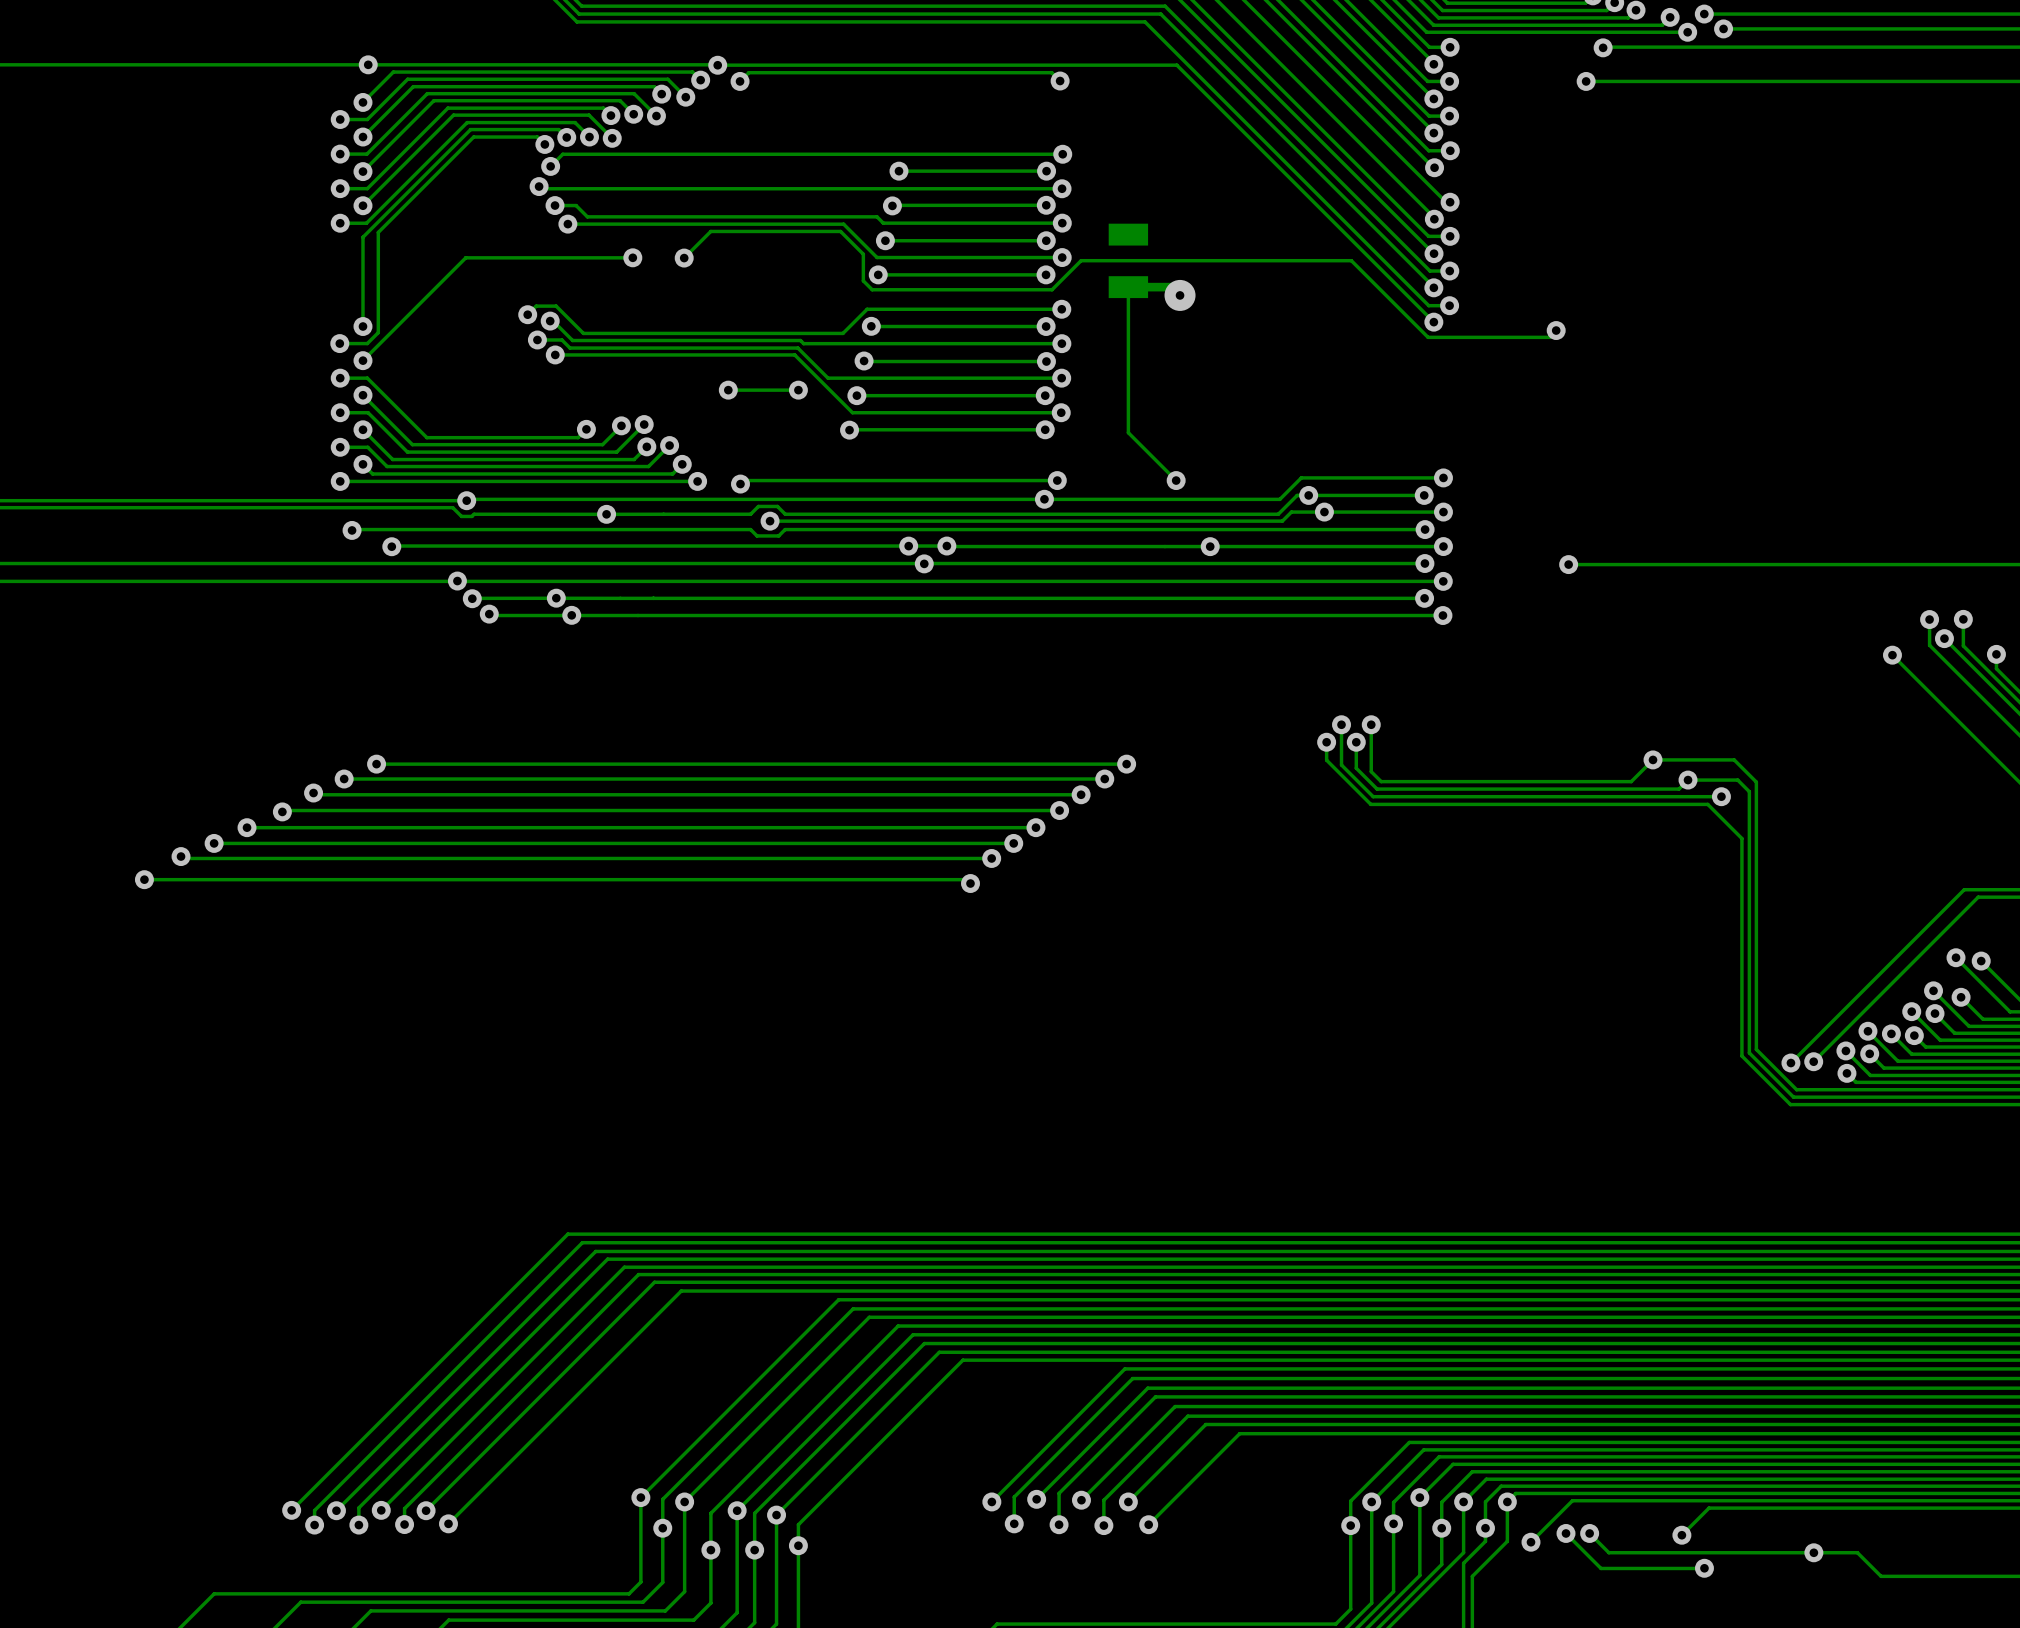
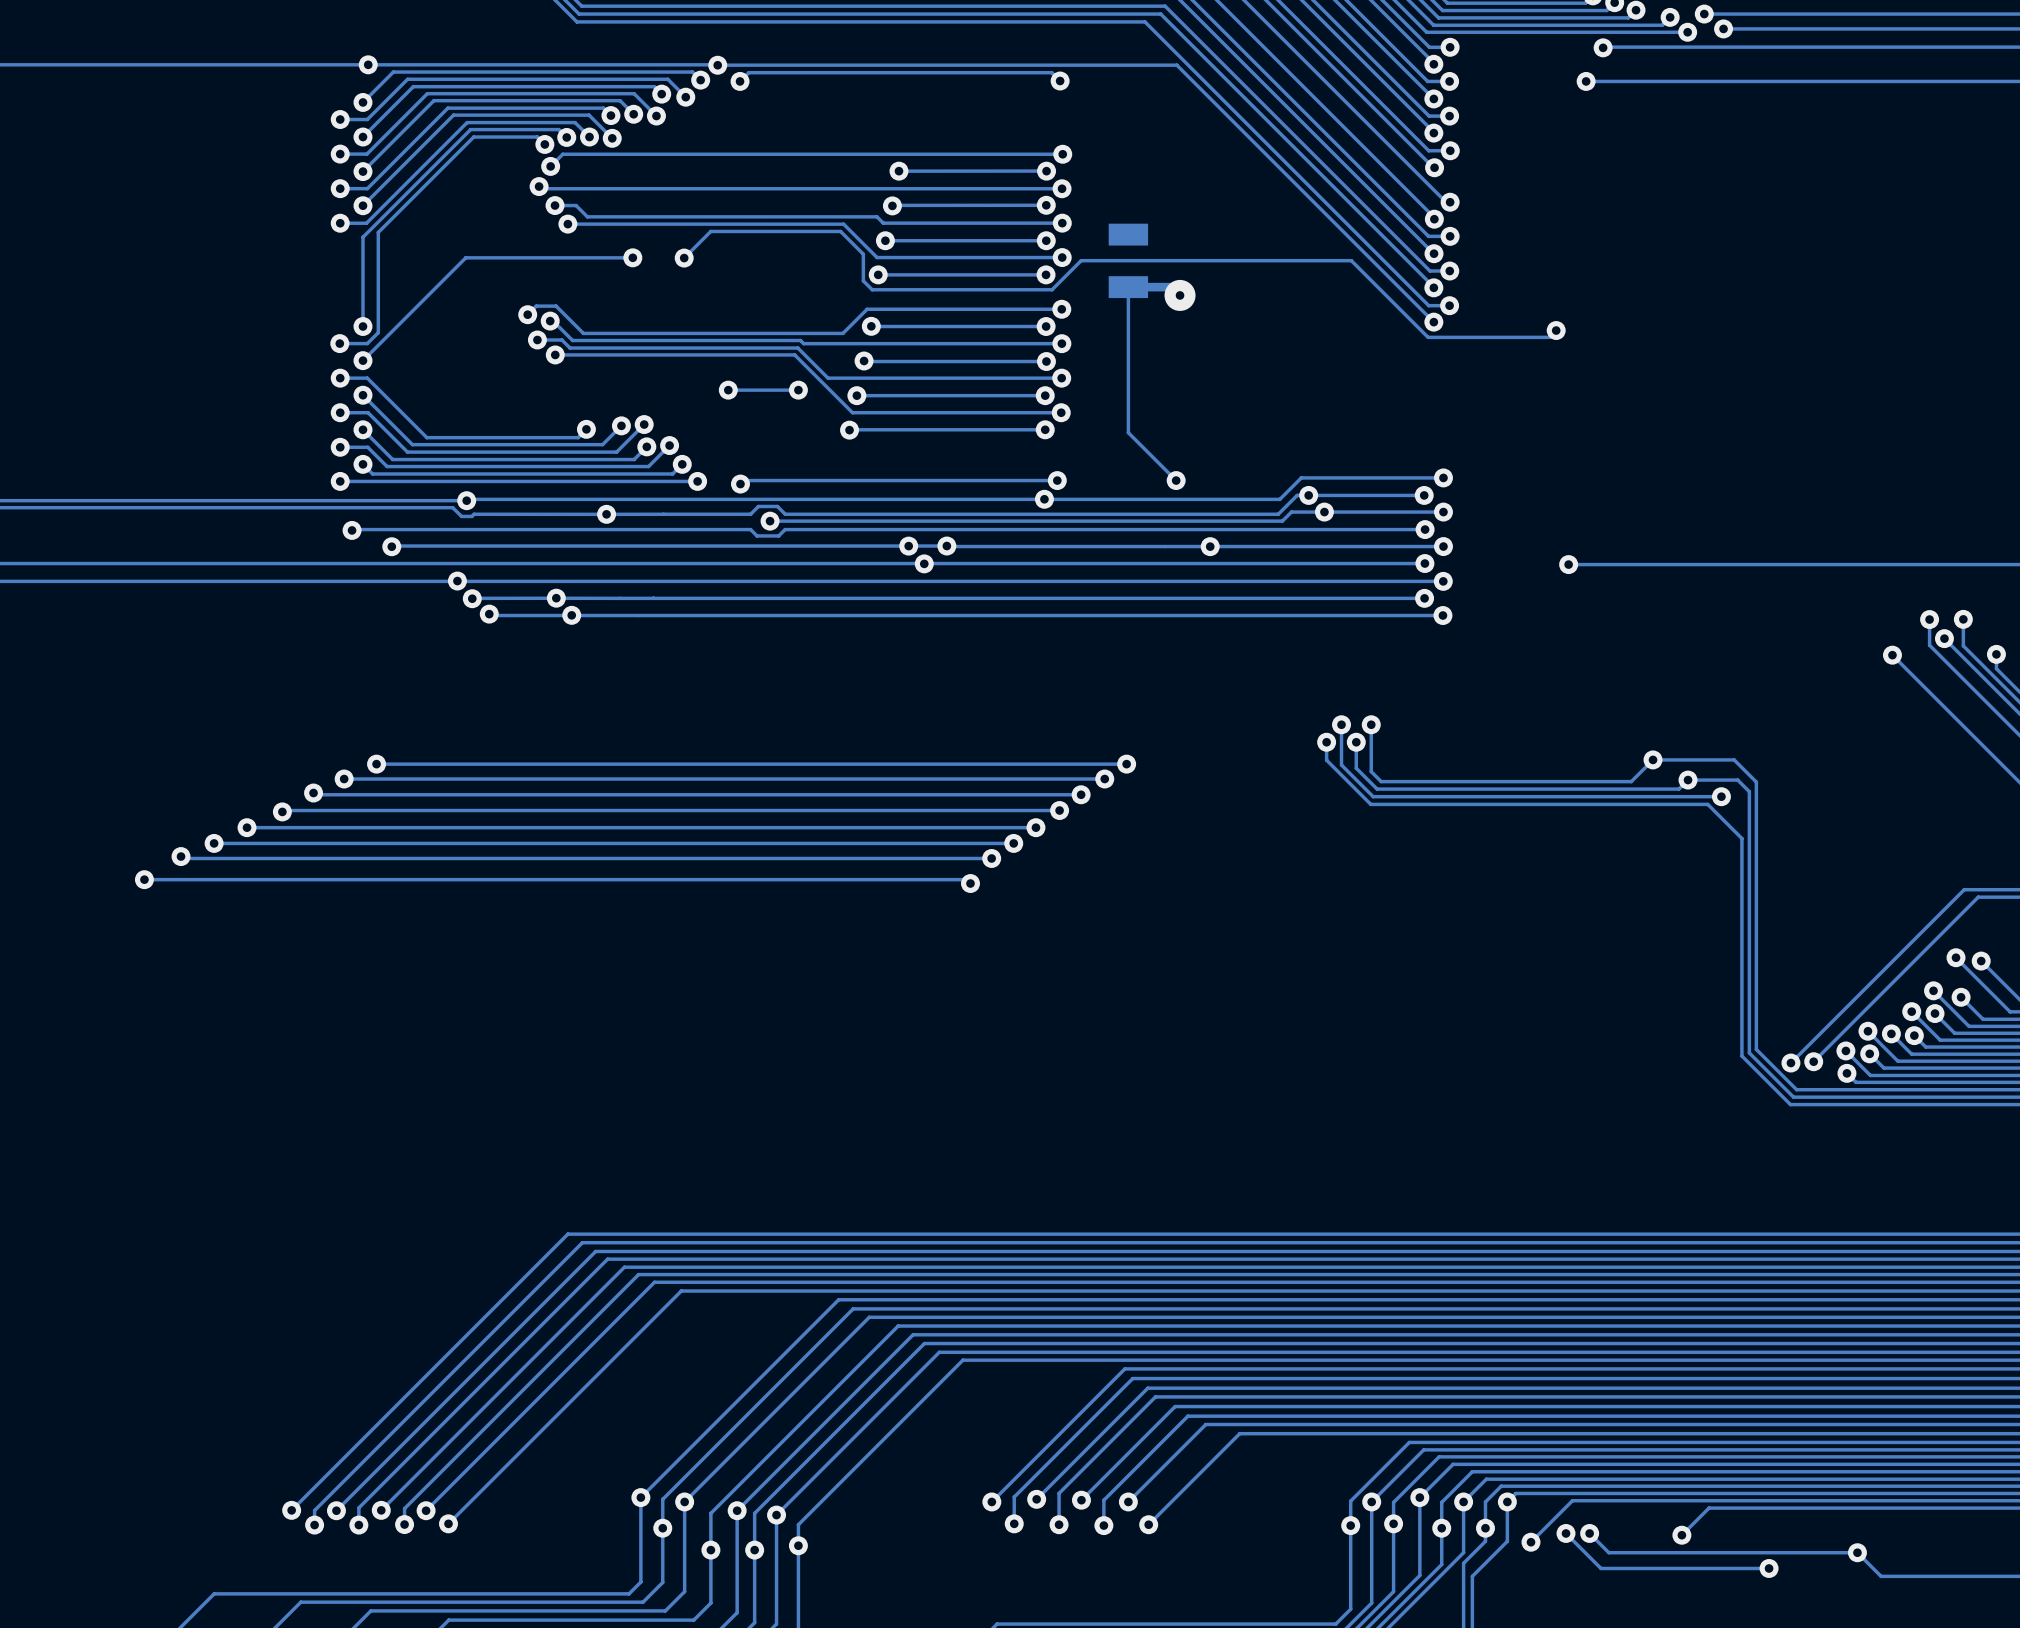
via: (1813, 1552) -> none
via: none -> (1857, 1552)
via: (1704, 1568) -> none
track: none -> (1769, 1568) (1704, 1568)
via: none -> (1769, 1568)

